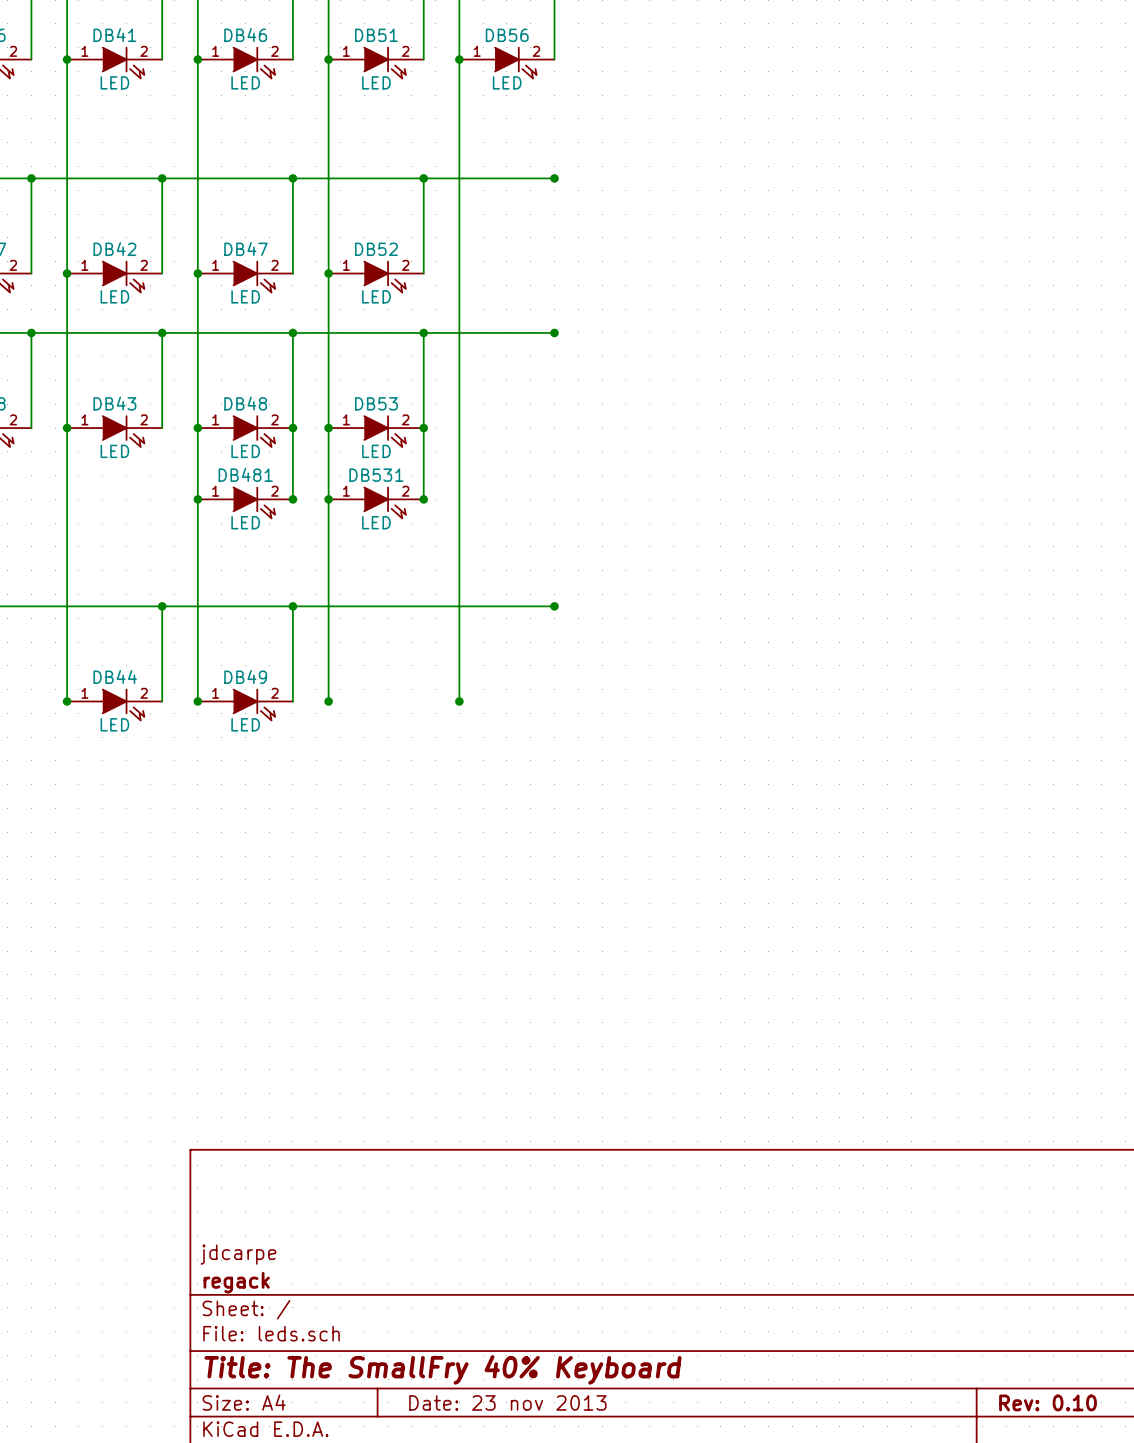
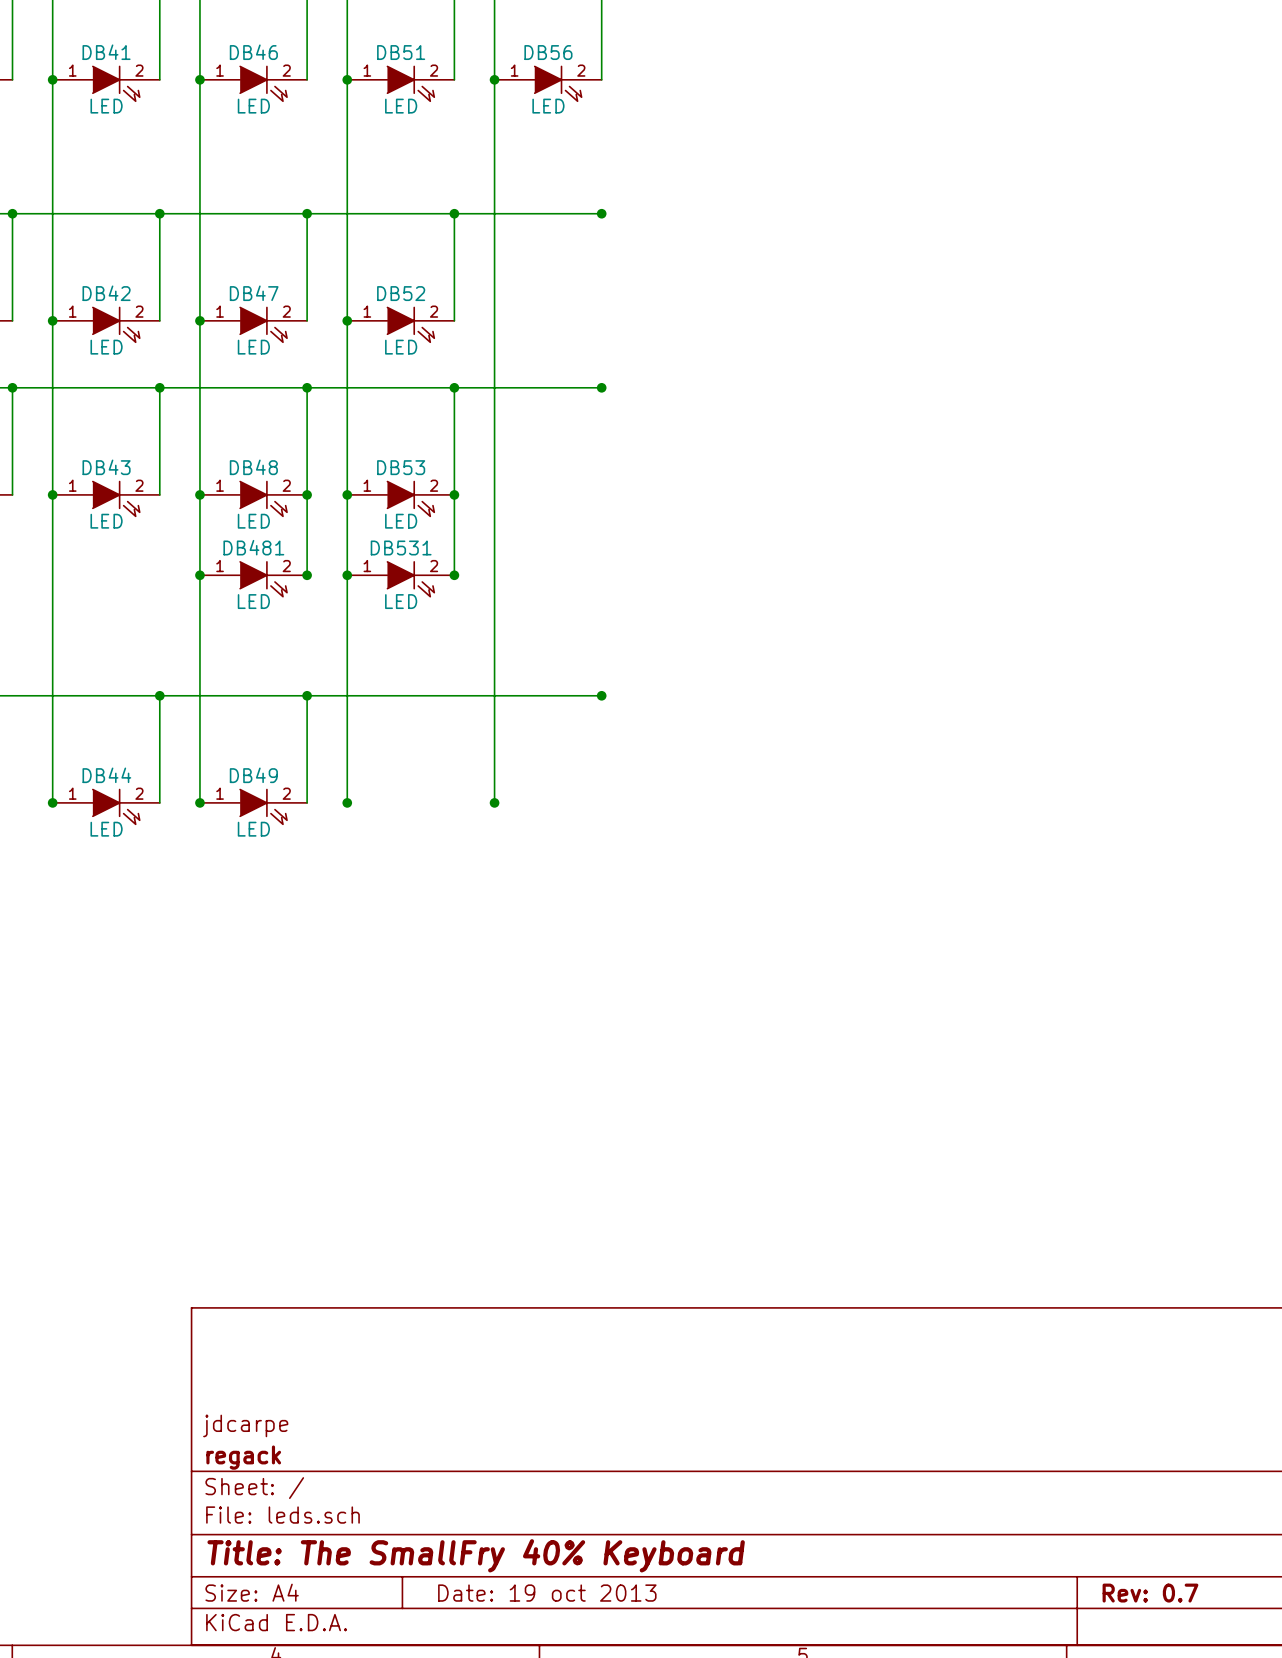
title block: Date: 23 nov 2013 (507, 1402) -> Date: 19 oct 2013 (547, 1593)
title block: Rev: 0.10 (1048, 1402) -> Rev: 0.7 (1150, 1593)

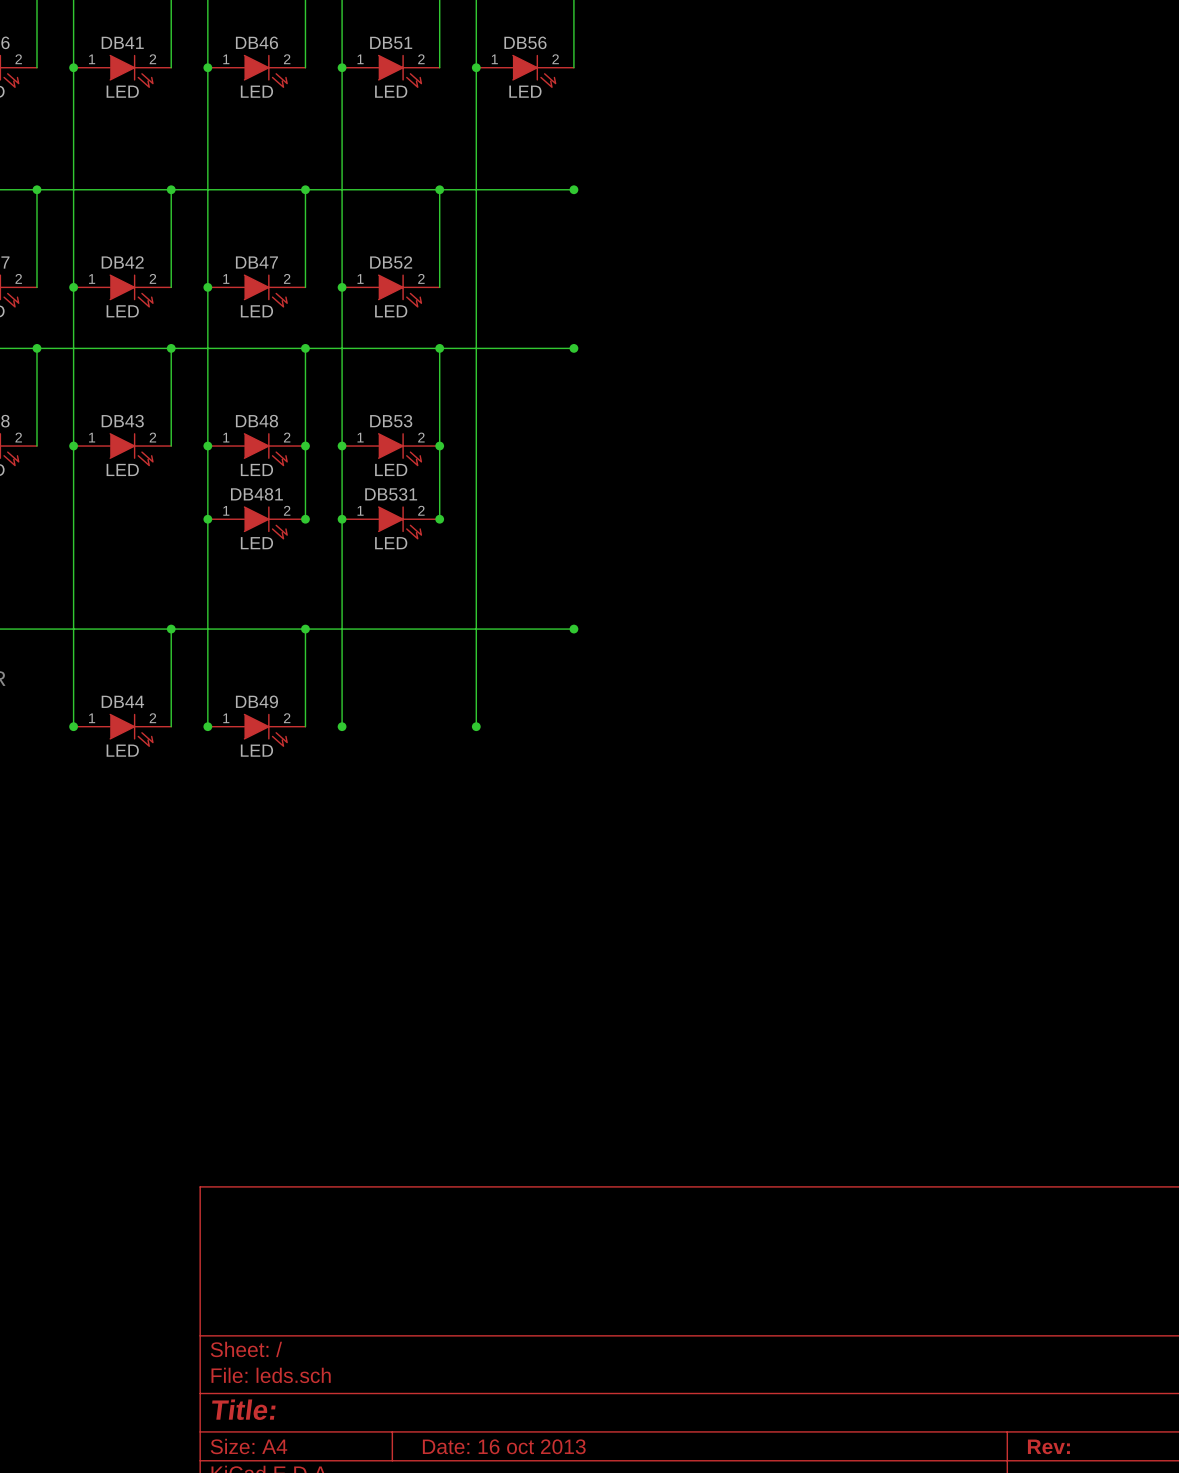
title block: jdcarpe (245, 1425) -> none
title block: regack (243, 1457) -> none
title block: Title: The SmallFry 40% Keyboard (476, 1555) -> Title: (243, 1409)
title block: Date: 19 oct 2013 (547, 1593) -> Date: 16 oct 2013 (504, 1446)
title block: Rev: 0.7 (1150, 1593) -> Rev: (1048, 1446)

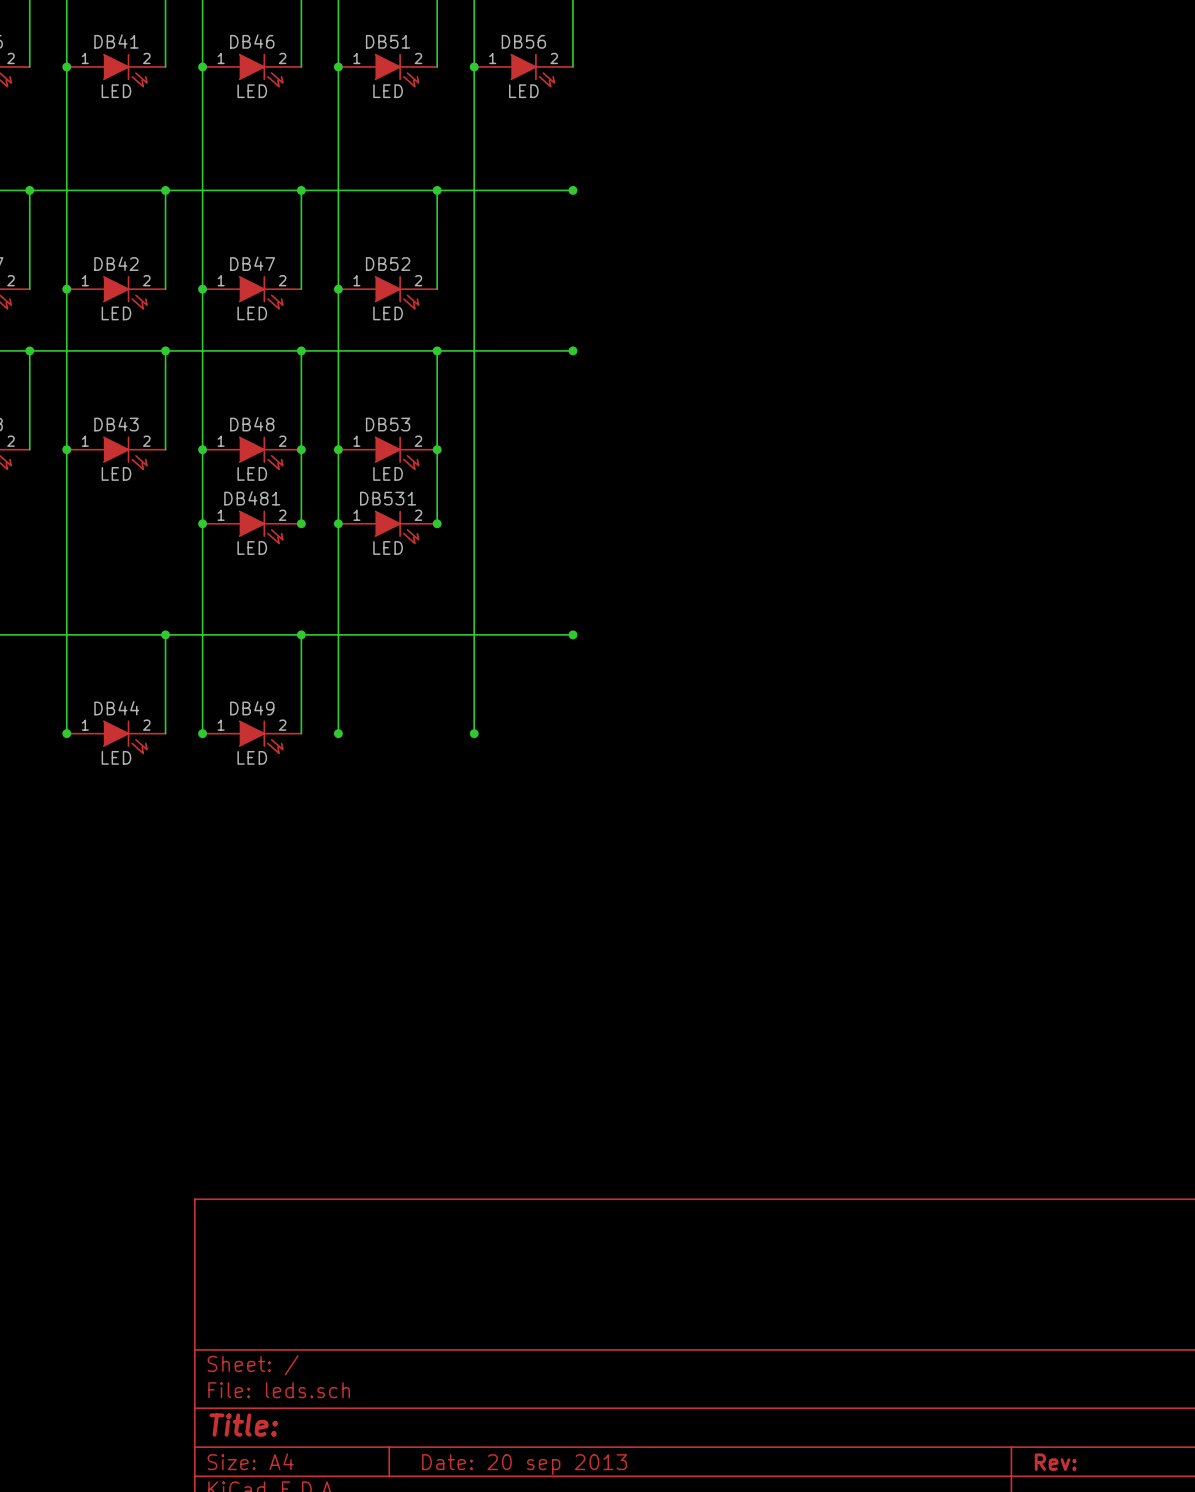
title block: Date: 16 oct 2013 (504, 1446) -> Date: 20 sep 2013 (524, 1464)

